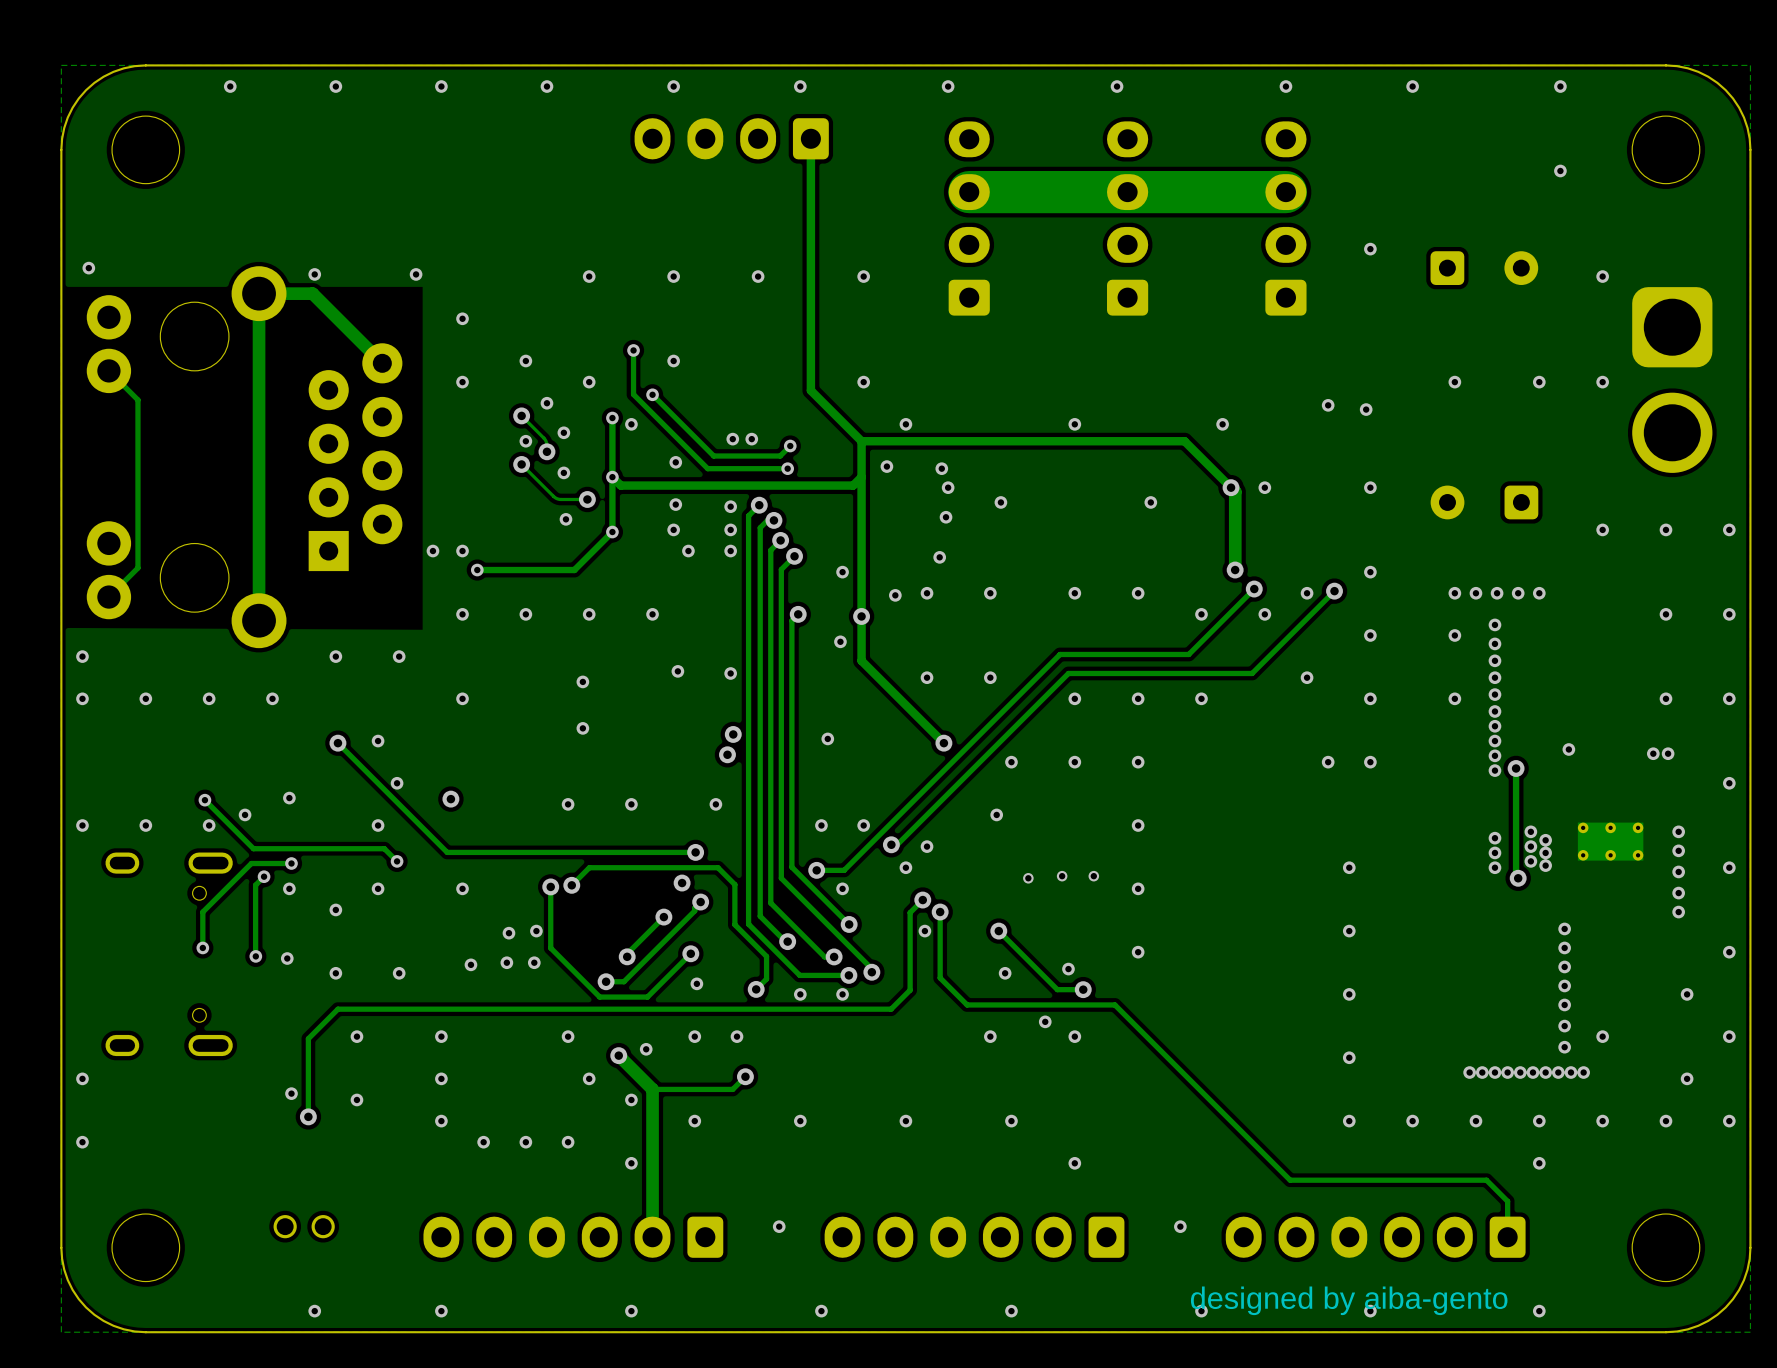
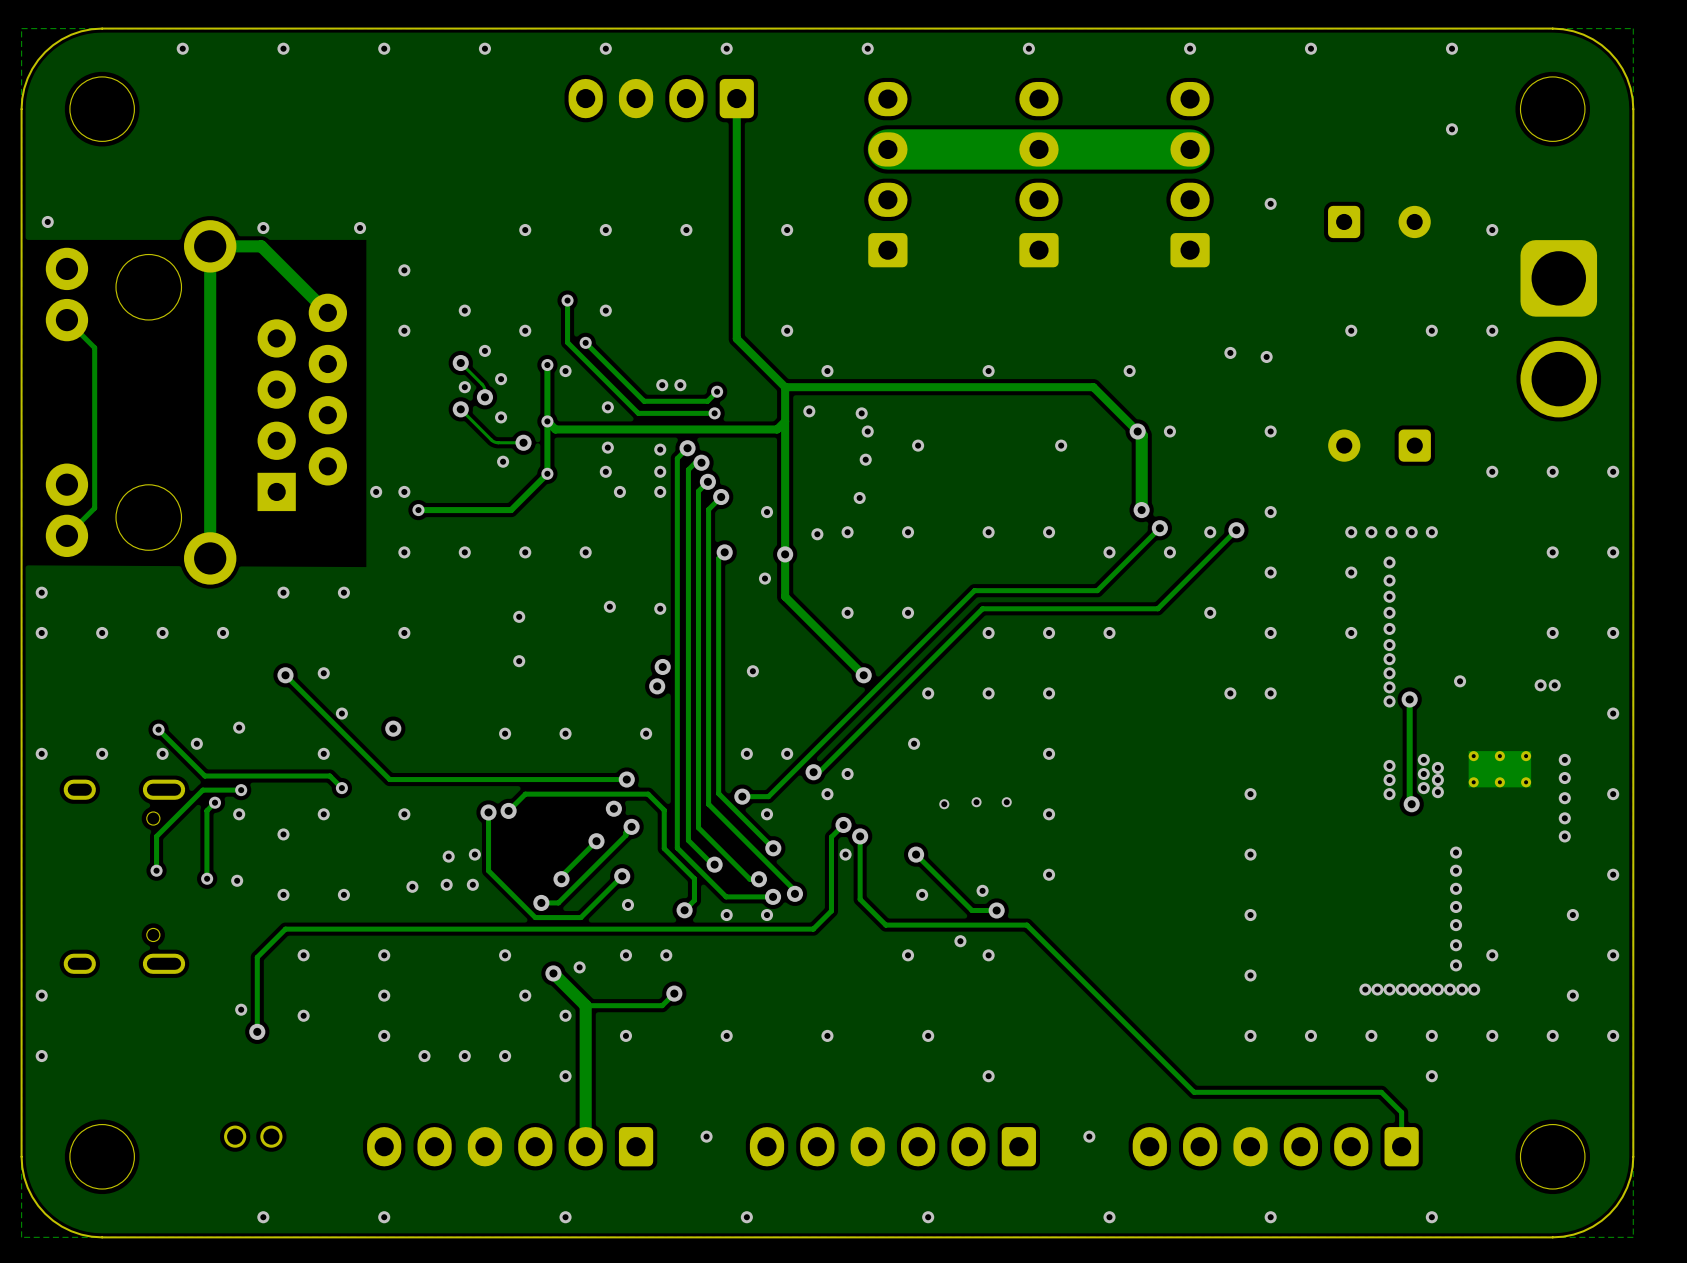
text: designed by aiba-gento (1349, 1300) -> none

